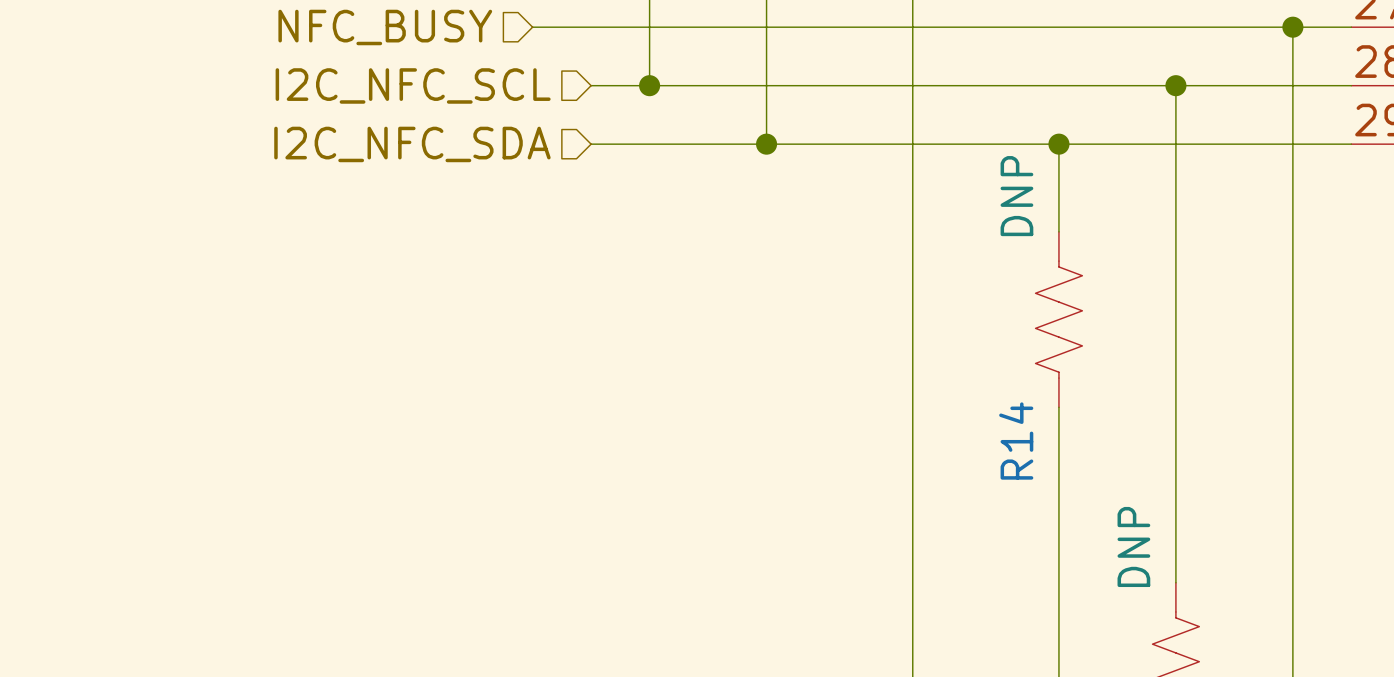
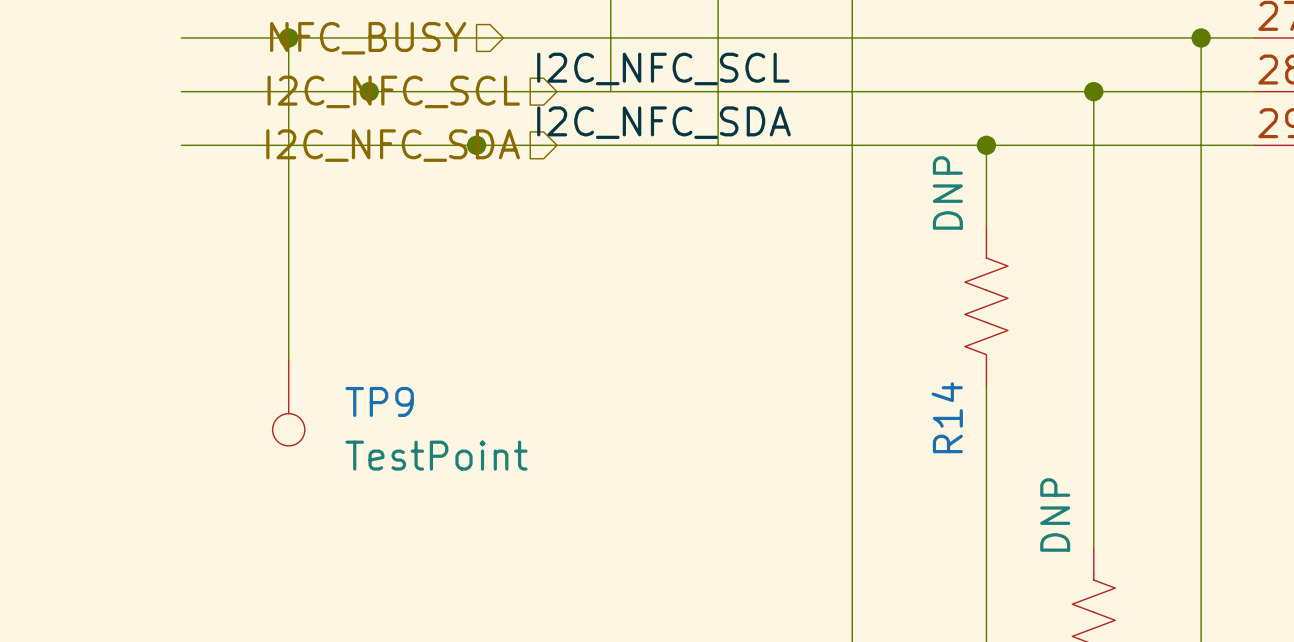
wire: none -> (181, 37) (503, 37)
wire: none -> (288, 37) (288, 360)
junction: none -> (288, 37)
label: none -> I2C_NFC_SCL (663, 68)
wire: none -> (181, 91) (557, 91)
junction: none -> (369, 91)
junction: (649, 85) -> none
label: none -> I2C_NFC_SDA (663, 122)
wire: none -> (181, 145) (557, 145)
junction: none -> (476, 145)
junction: (766, 144) -> none
TP9: none -> TestPoint (288, 402)

